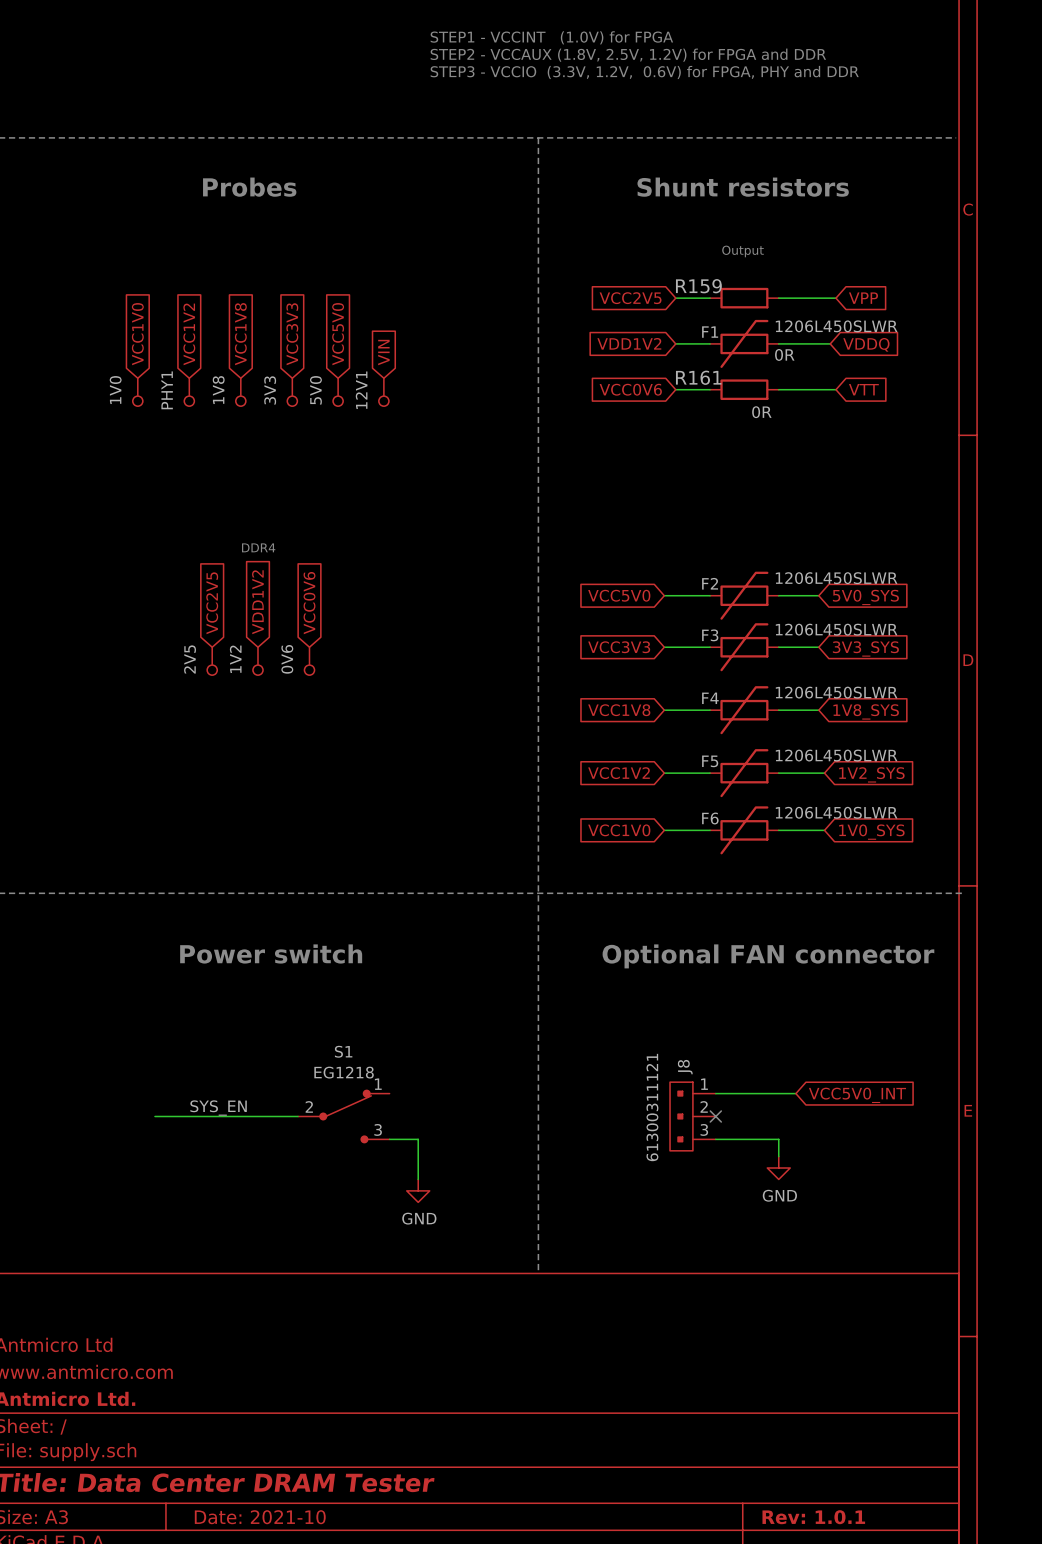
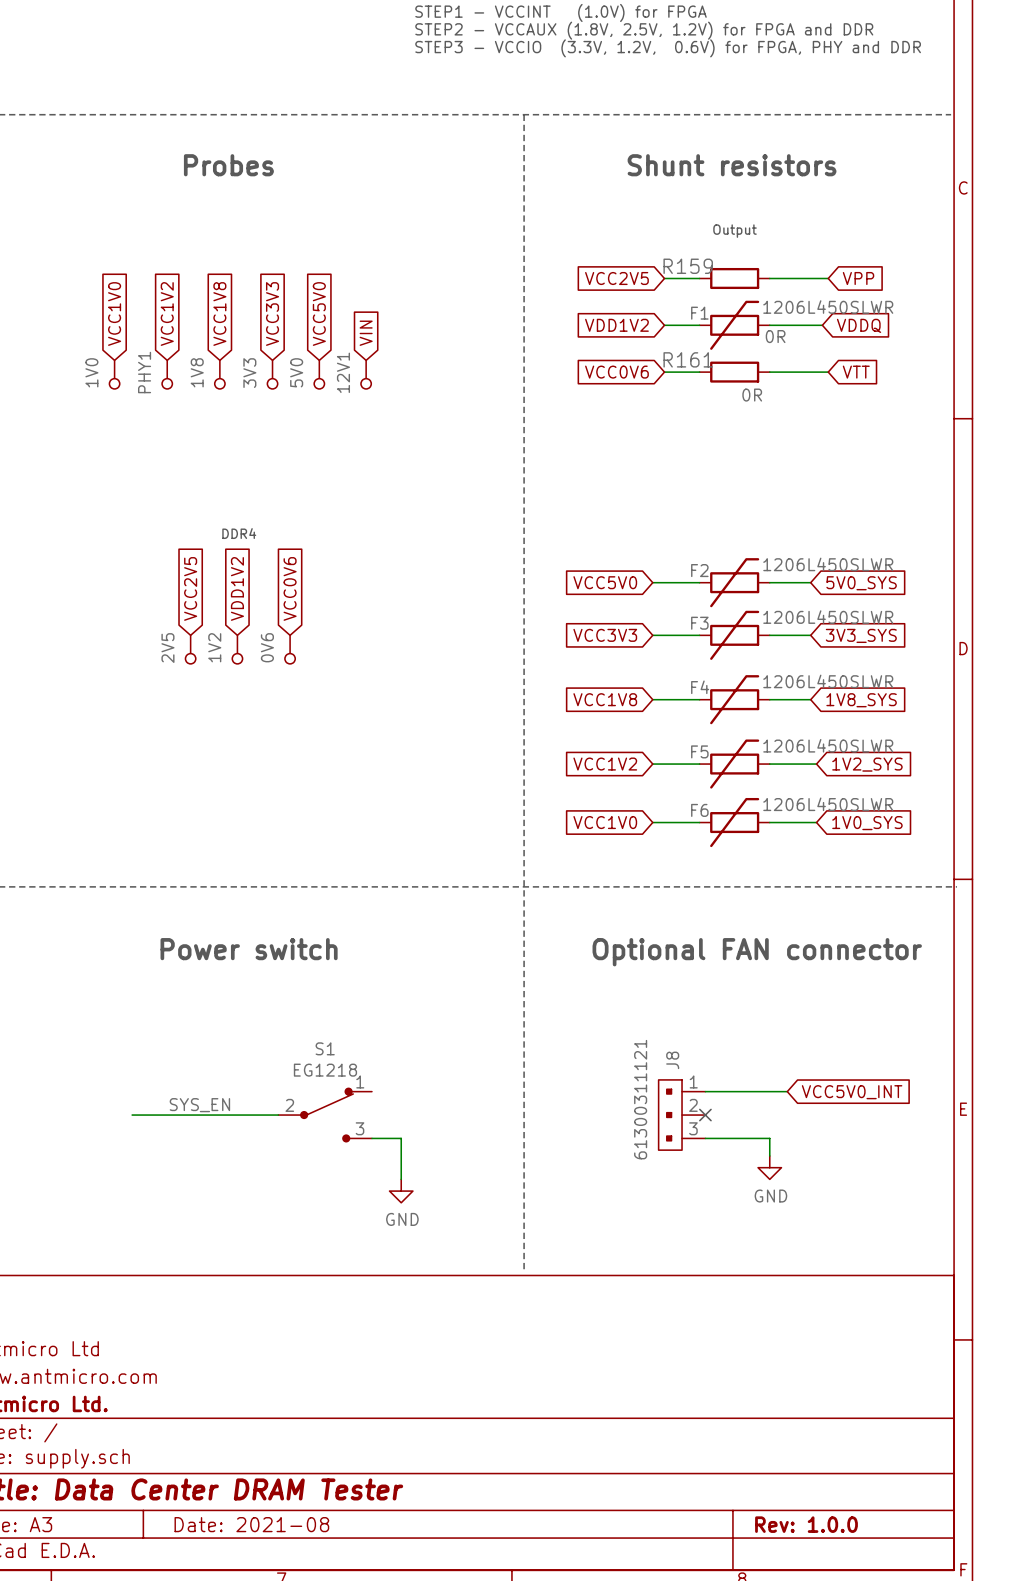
title block: Date: 2021-10 (260, 1517) -> Date: 2021-08 (251, 1524)
title block: Rev: 1.0.1 (813, 1517) -> Rev: 1.0.0 (806, 1524)

